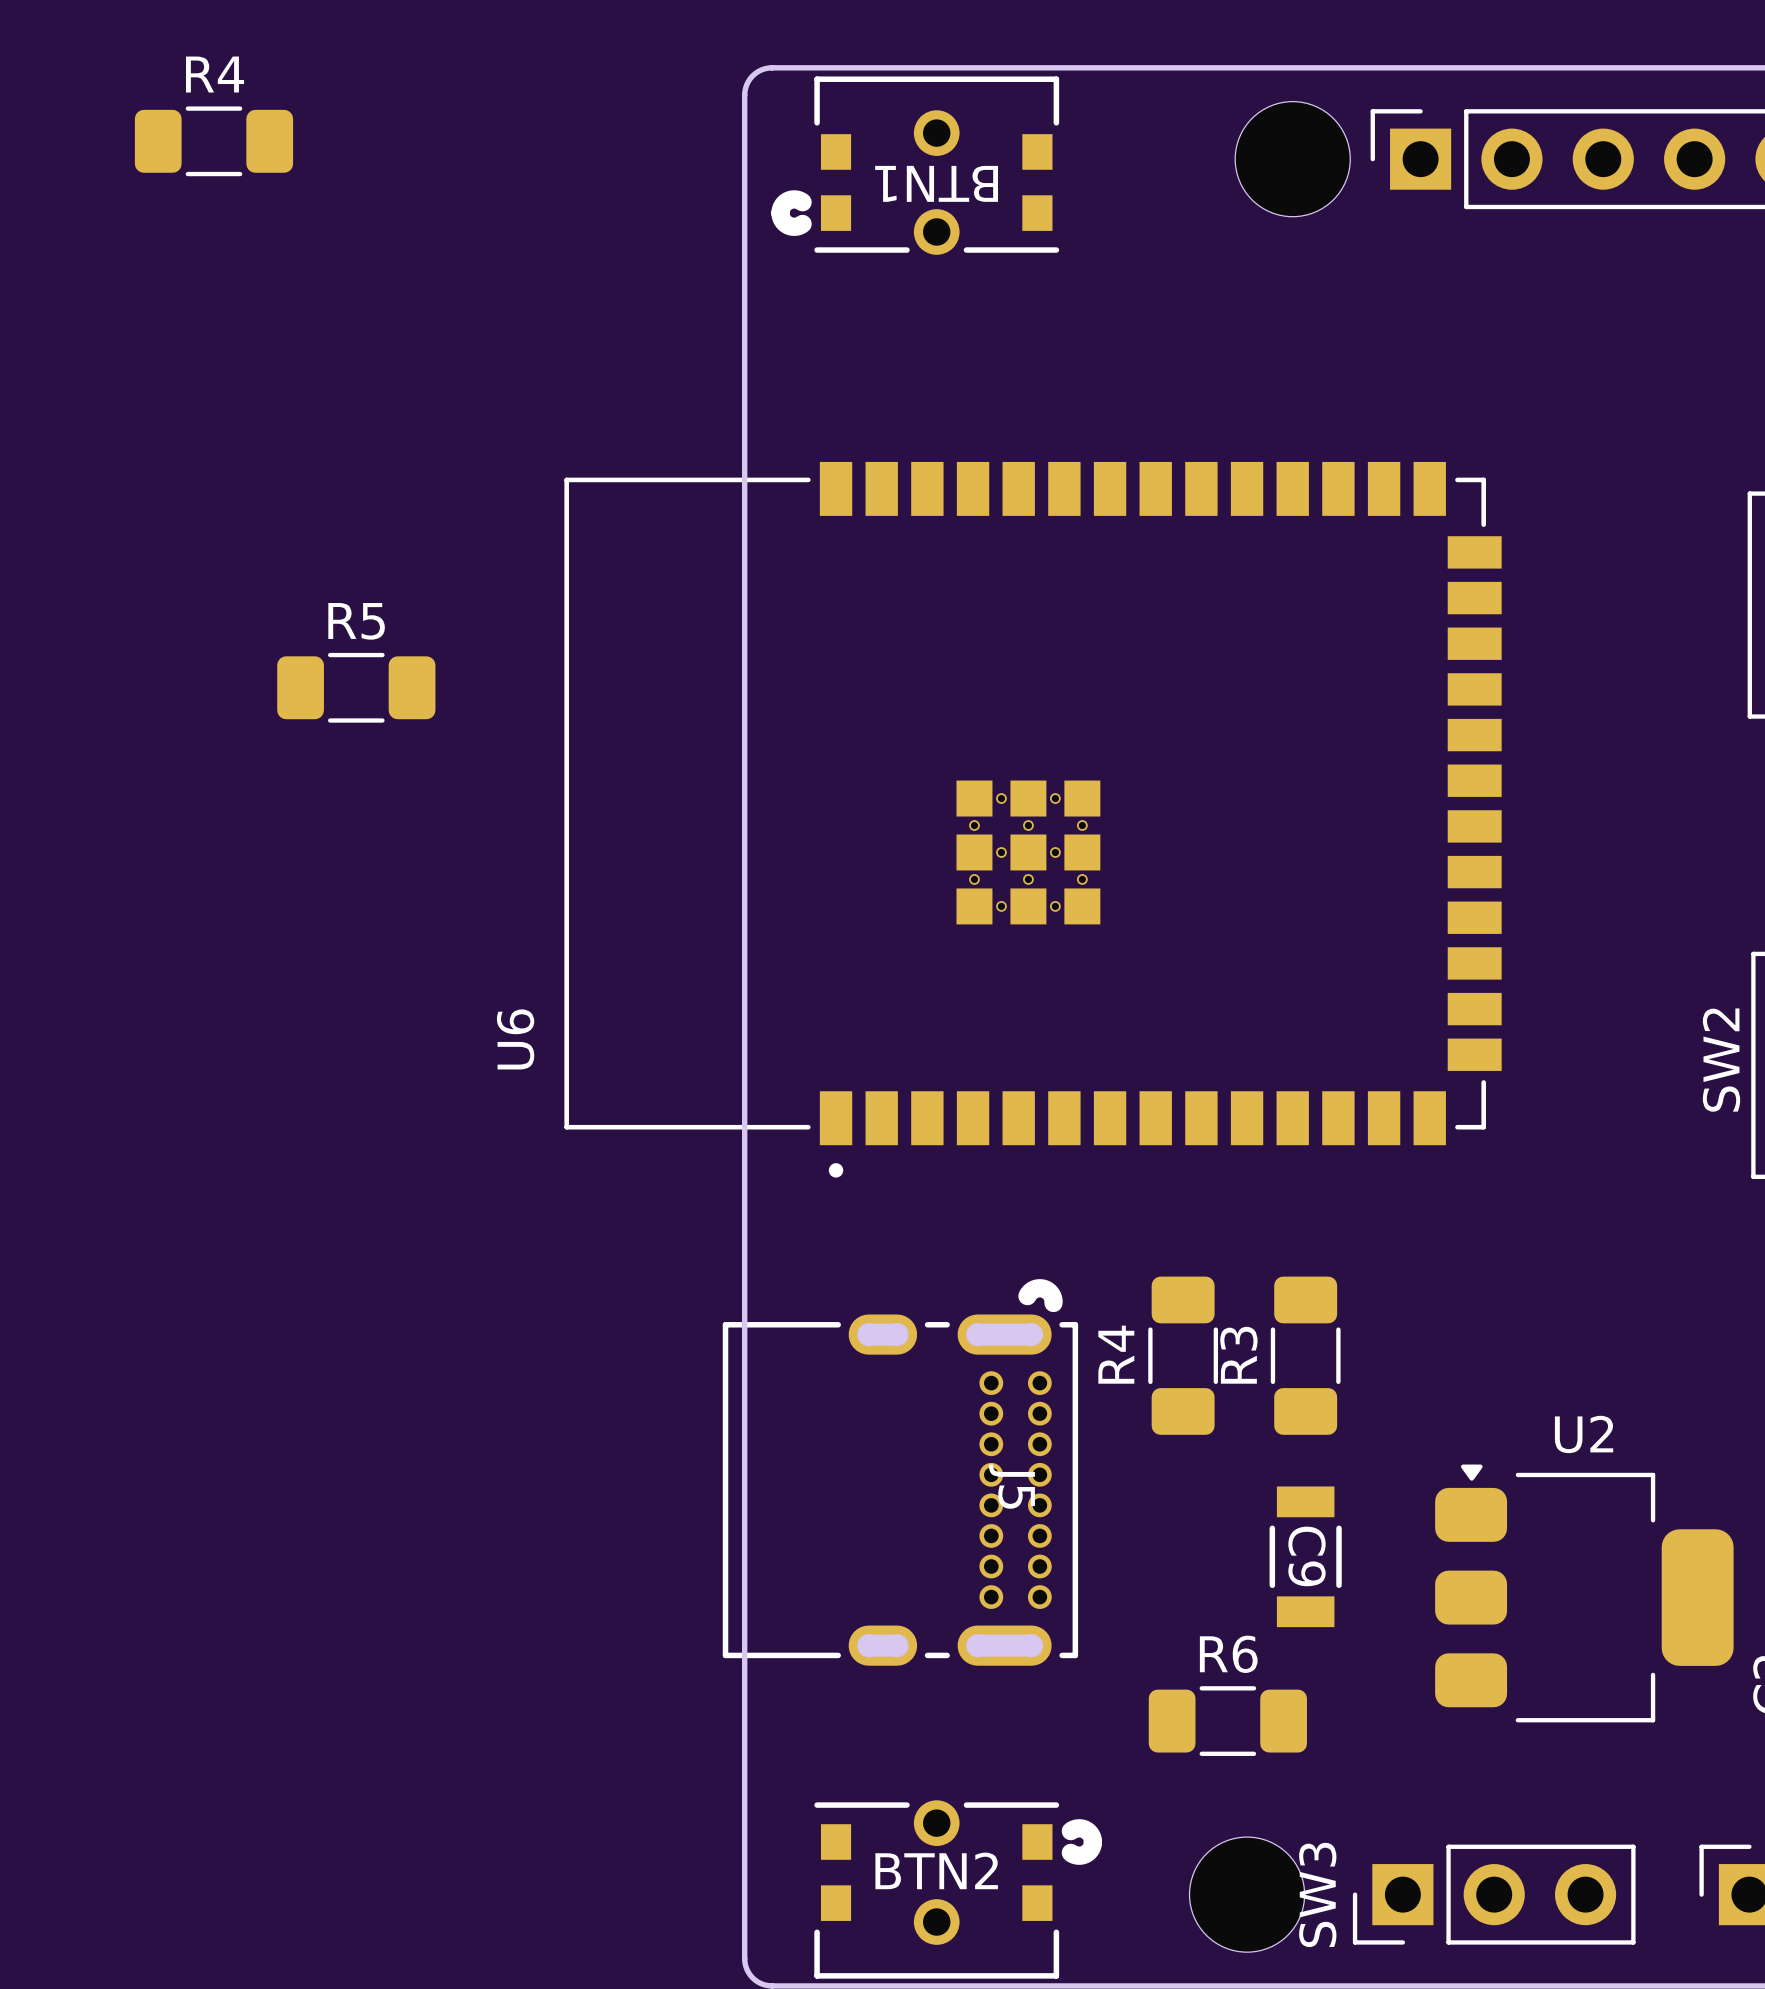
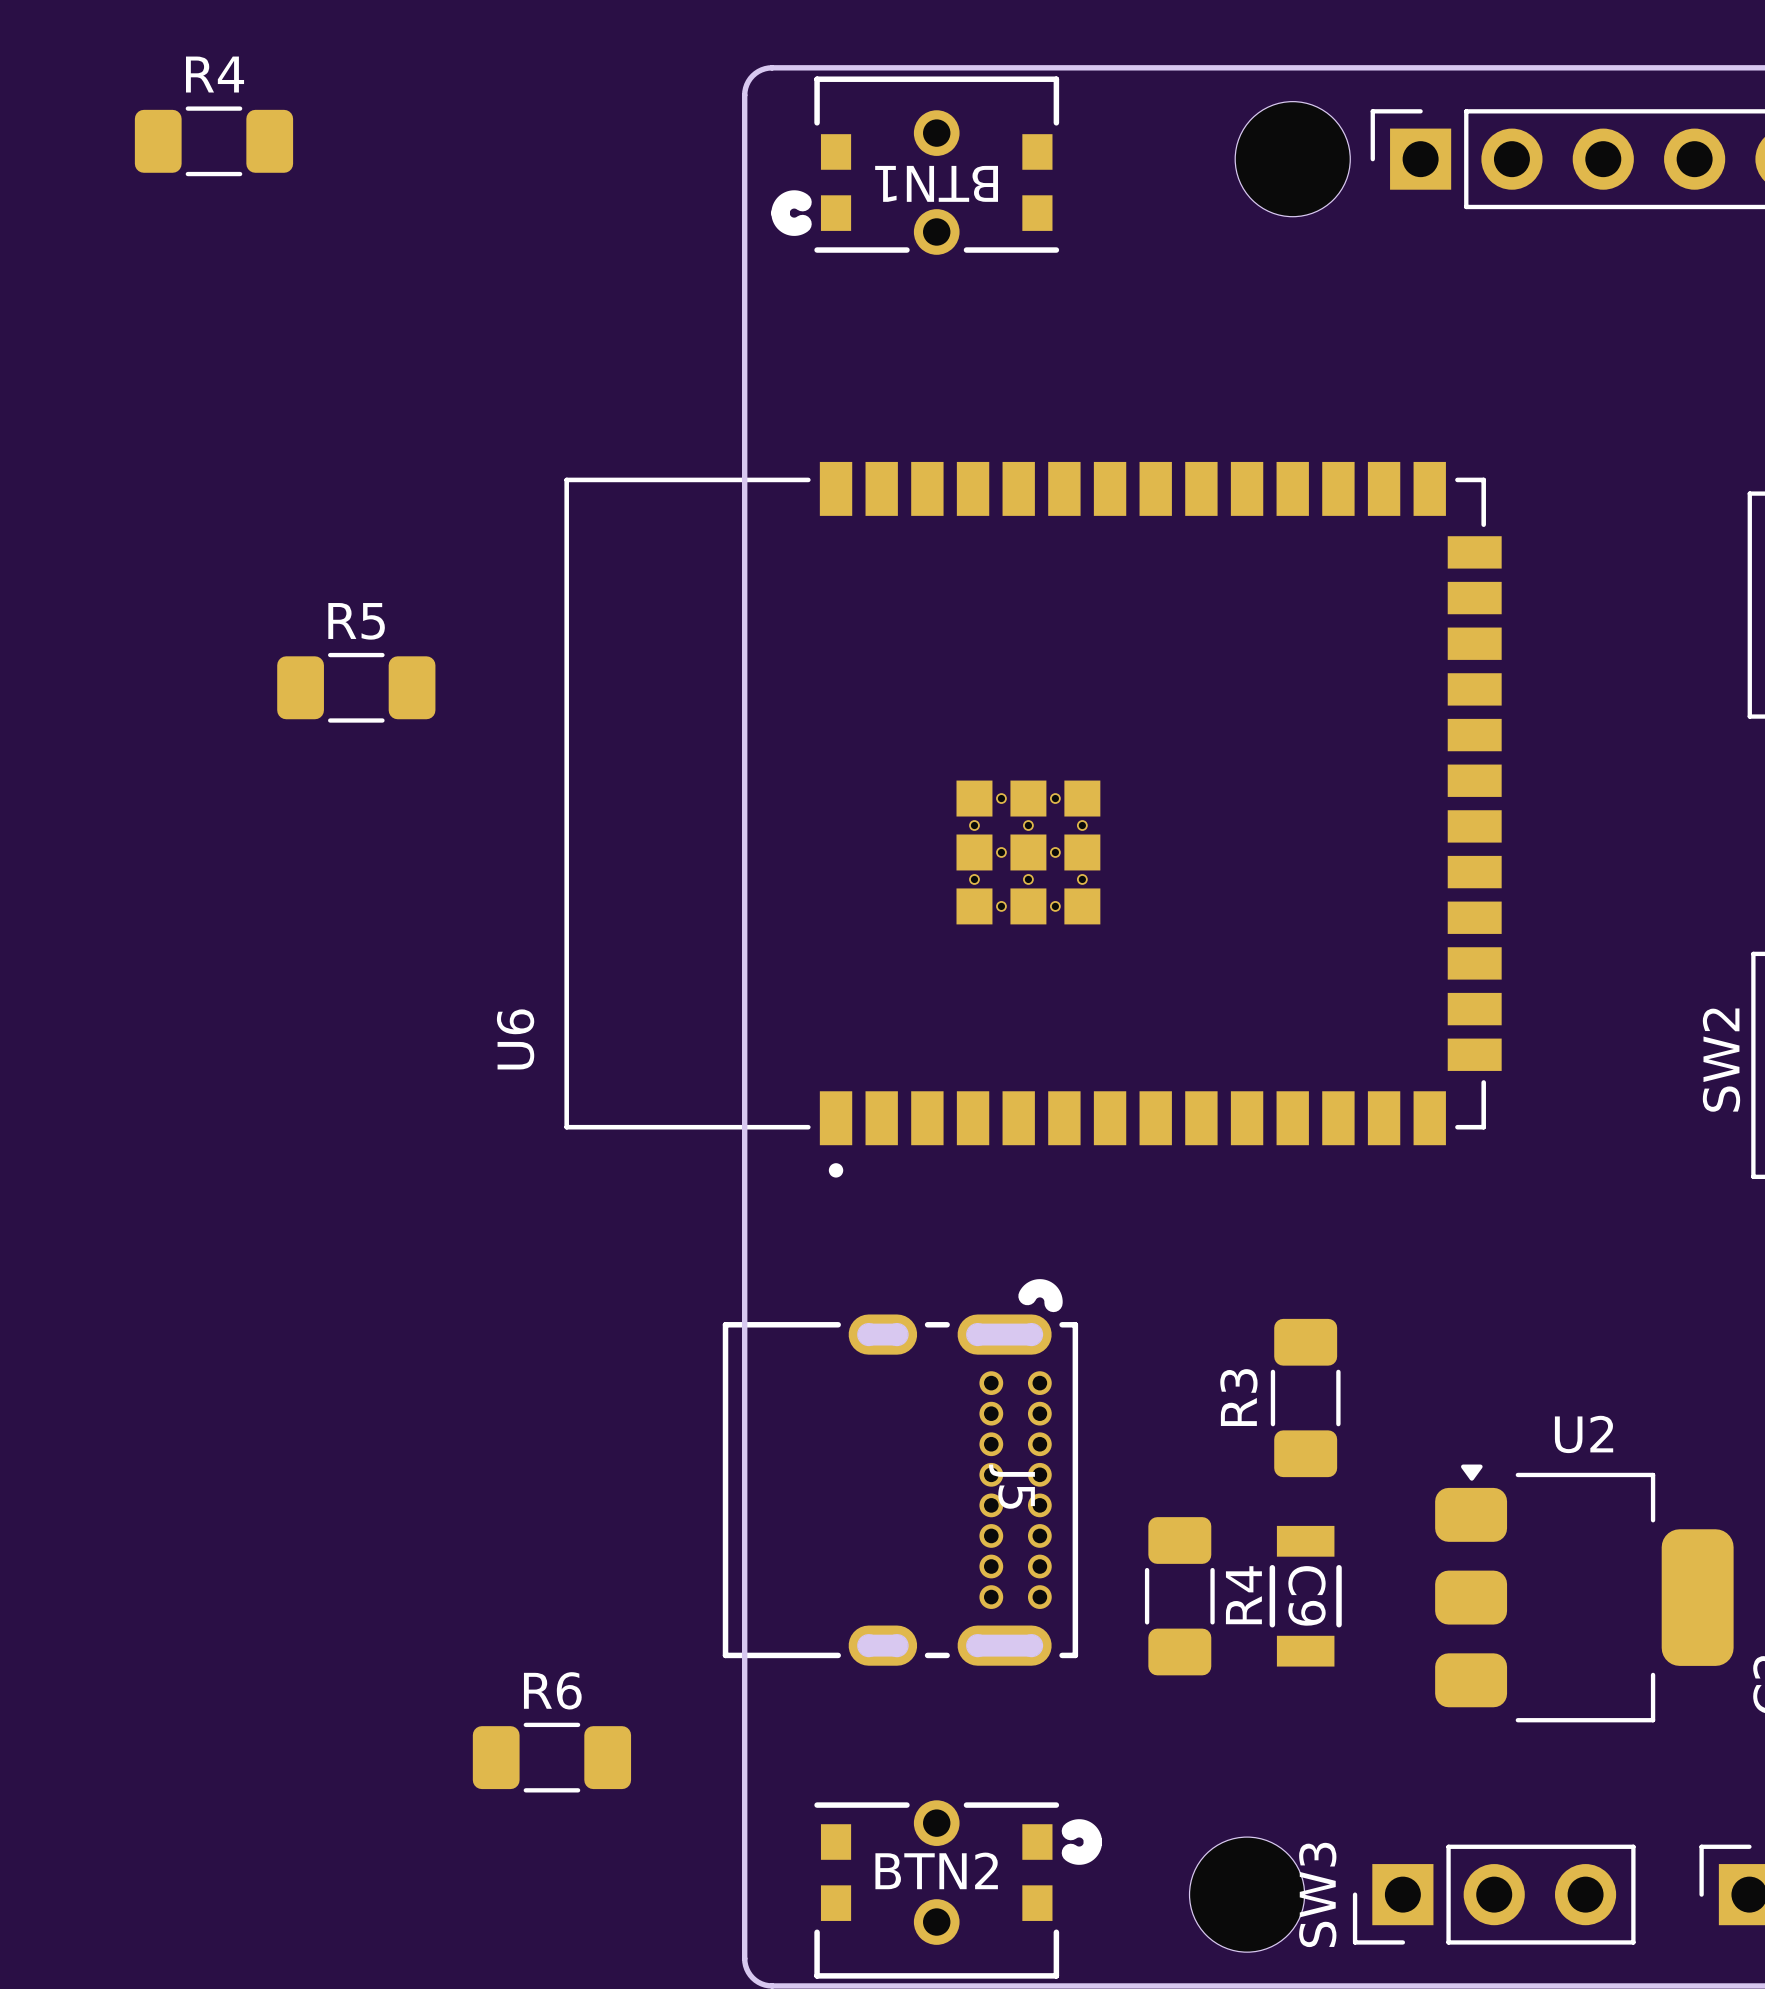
R4 name position: R4 (1116, 1354) -> R4 (1243, 1595)
R4 position: (1183, 1355) -> (1179, 1596)
R3 position: (1305, 1355) -> (1305, 1398)
C9 position: (1305, 1556) -> (1305, 1596)
R6 position: (1227, 1721) -> (551, 1757)

